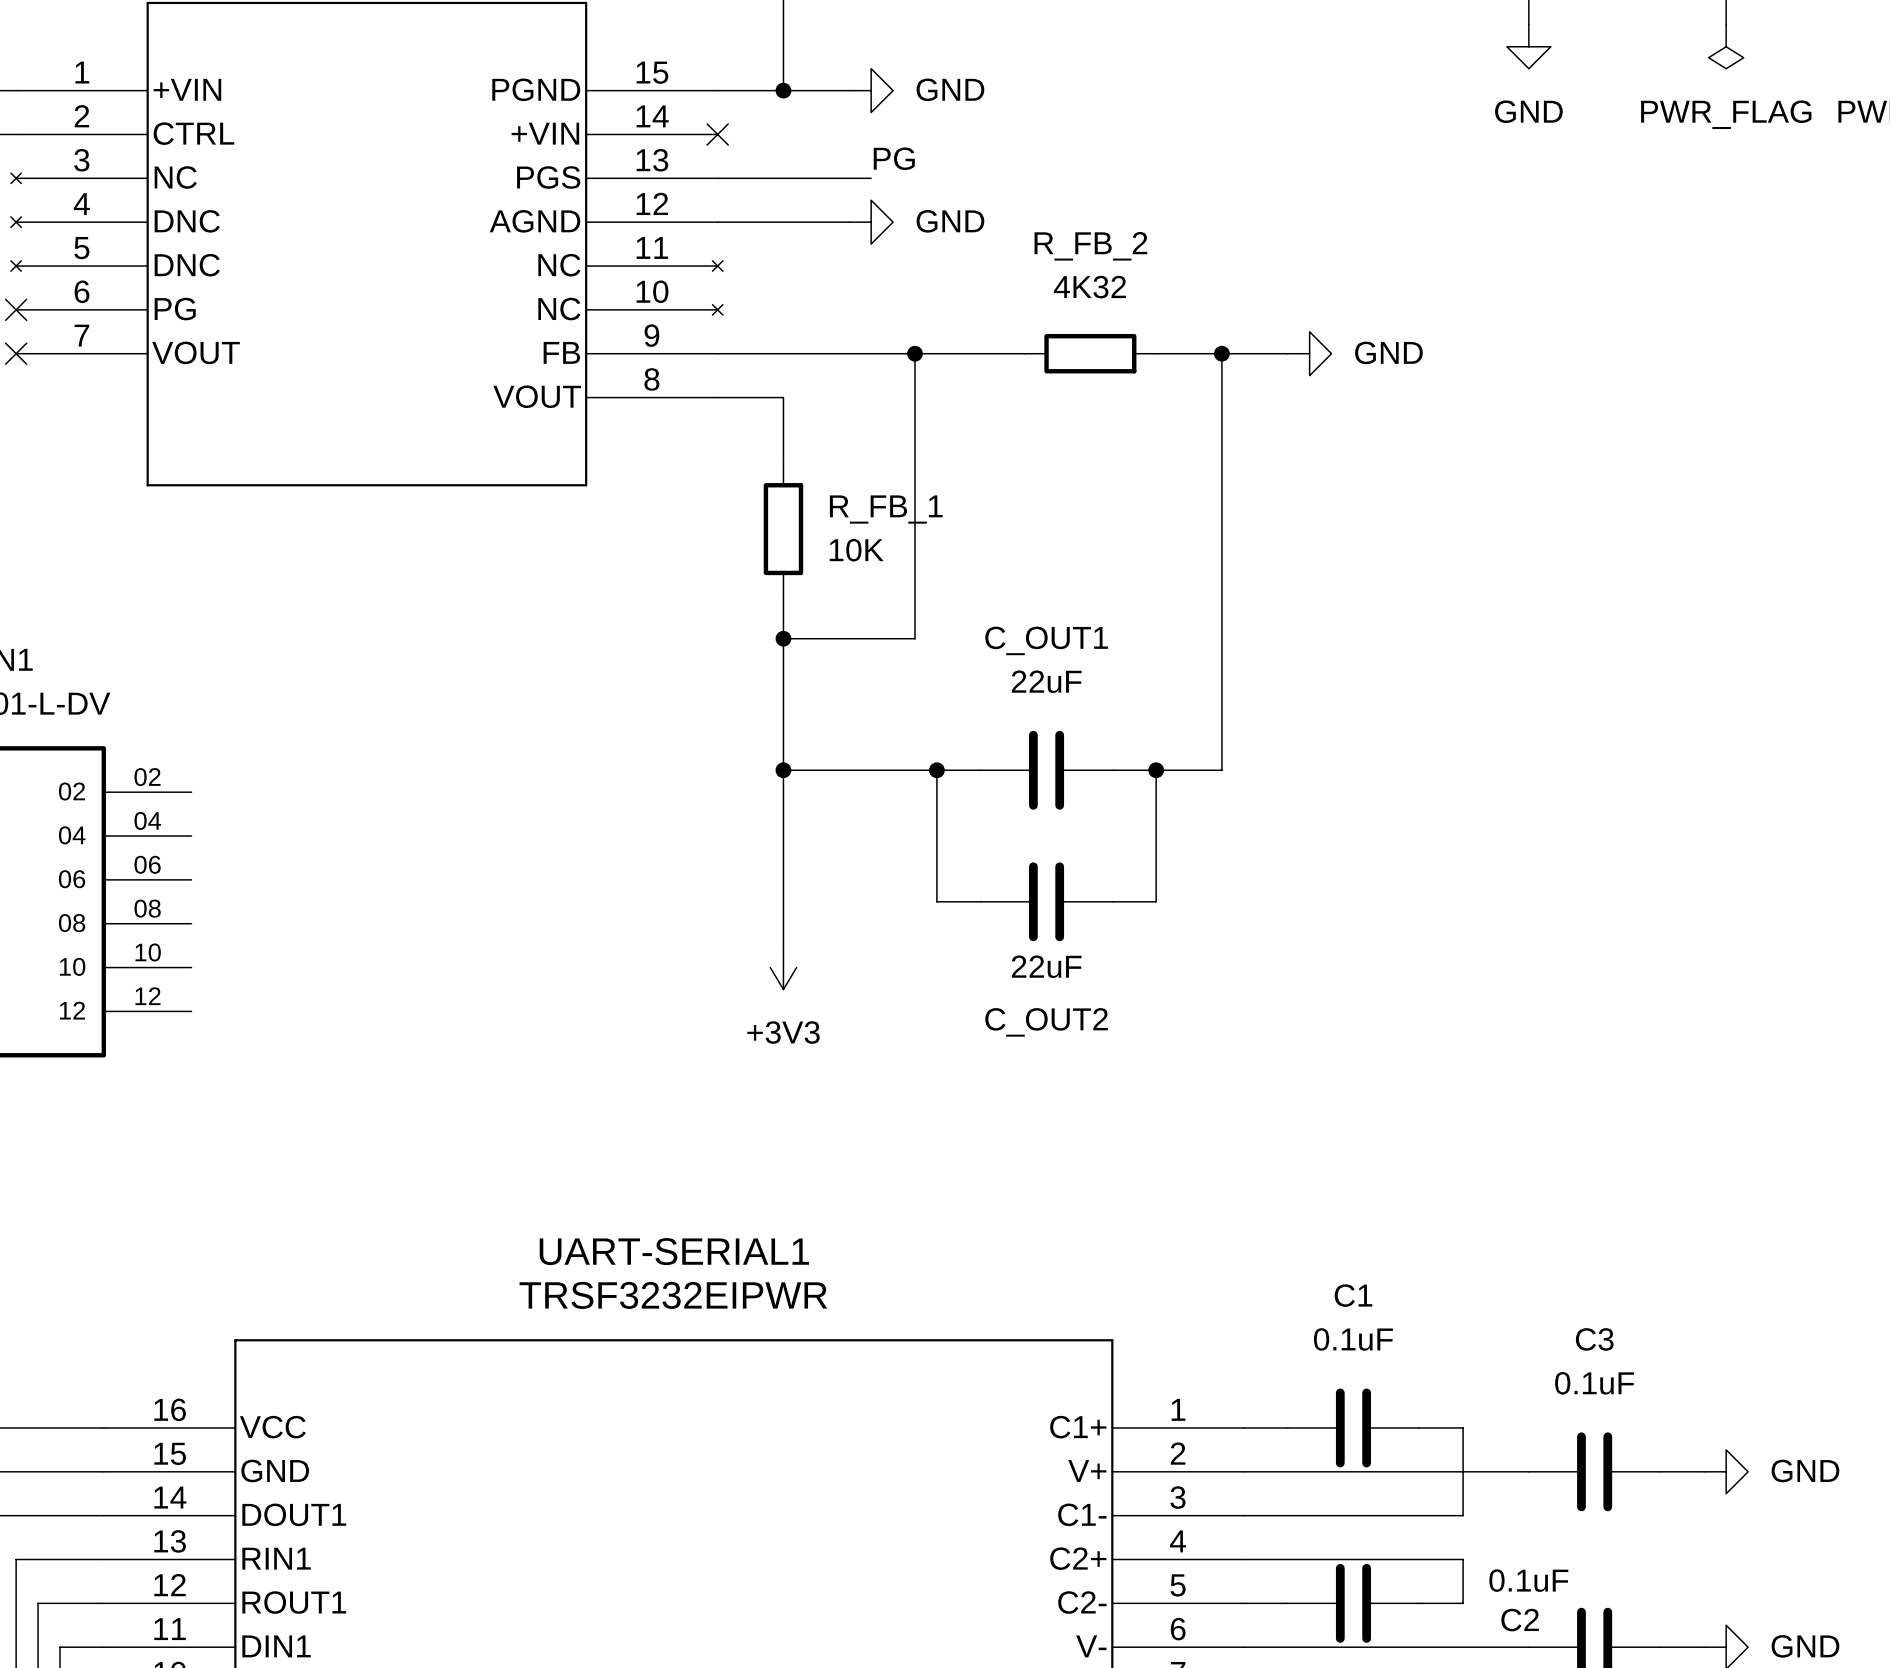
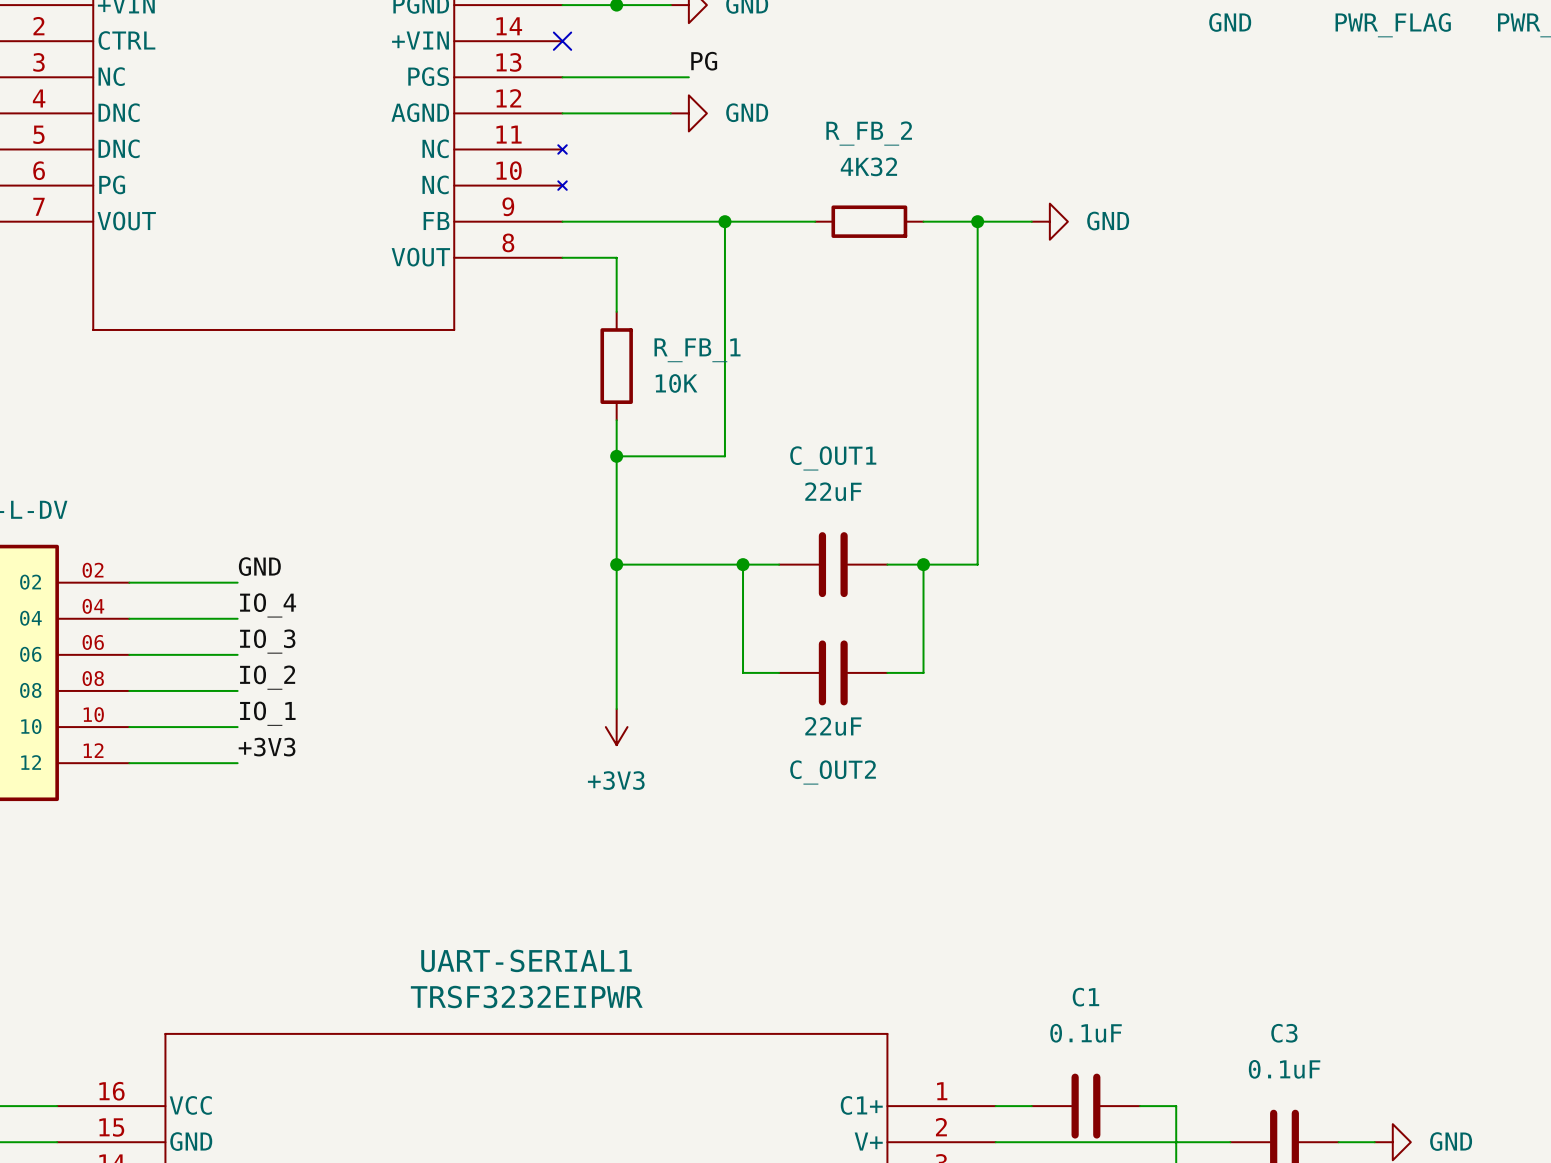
label: none -> GND (259, 566)
wire: none -> (129, 582) (237, 582)
label: none -> IO_4 (268, 605)
wire: none -> (129, 618) (237, 618)
label: none -> IO_3 (267, 641)
wire: none -> (129, 654) (237, 654)
label: none -> IO_2 (267, 677)
wire: none -> (129, 690) (237, 690)
label: none -> IO_1 (267, 713)
wire: none -> (129, 727) (237, 727)
label: none -> +3V3 (267, 747)
wire: none -> (129, 763) (237, 763)

